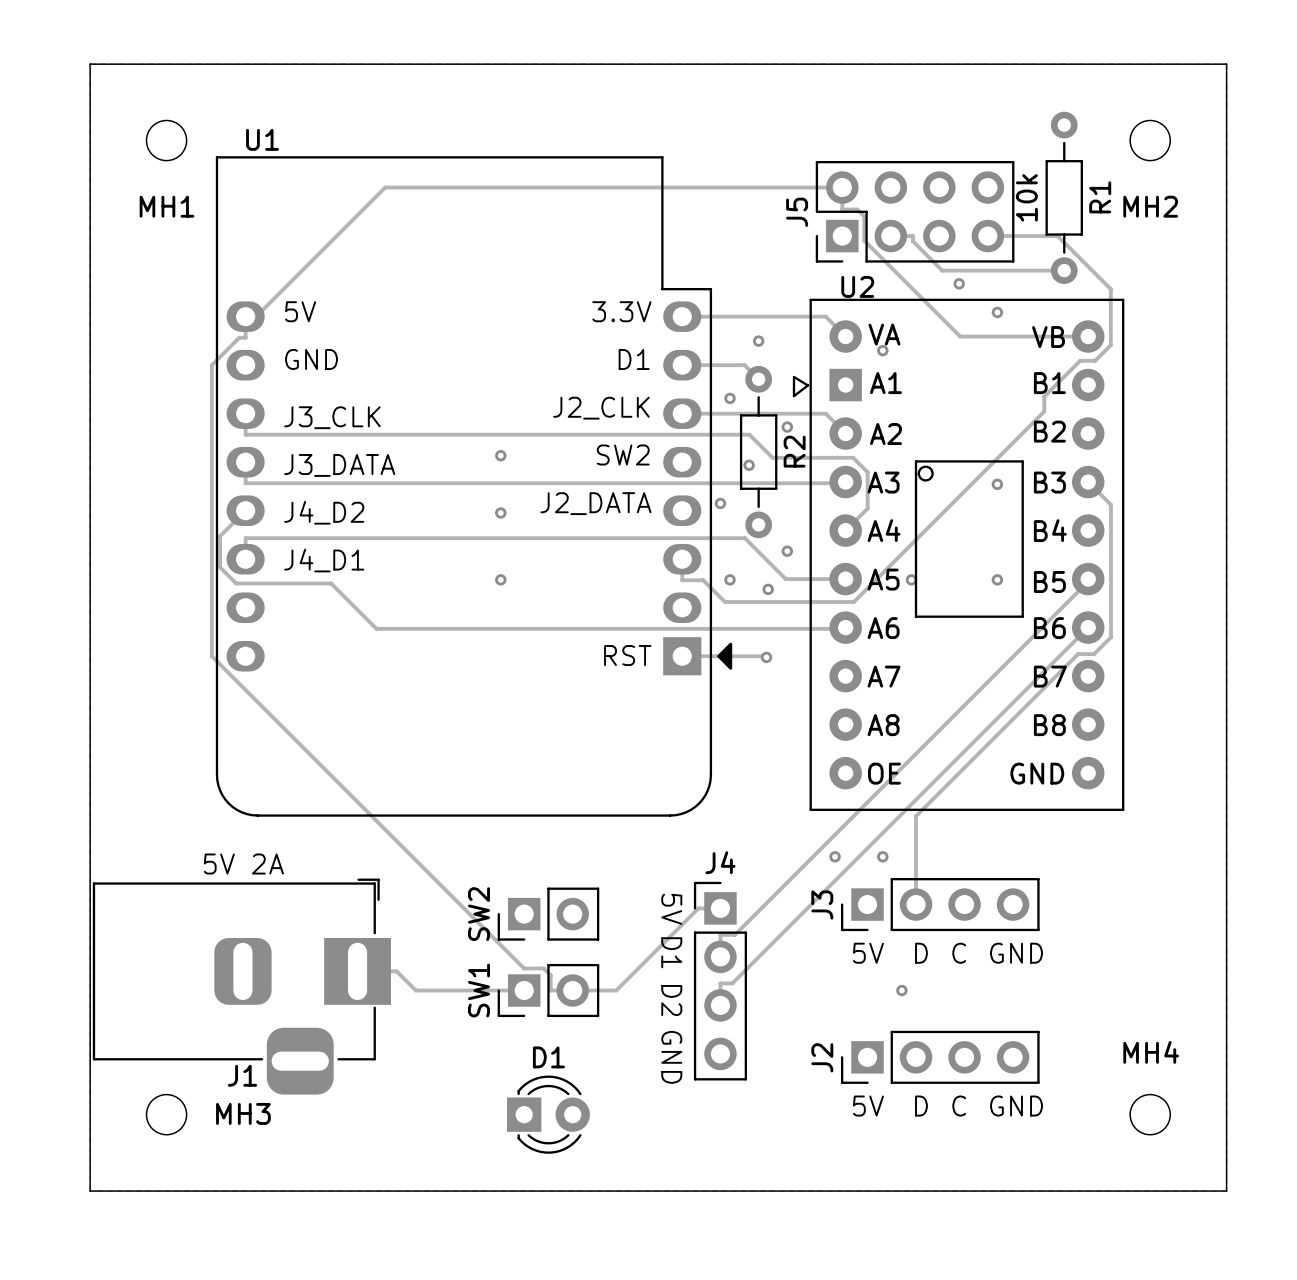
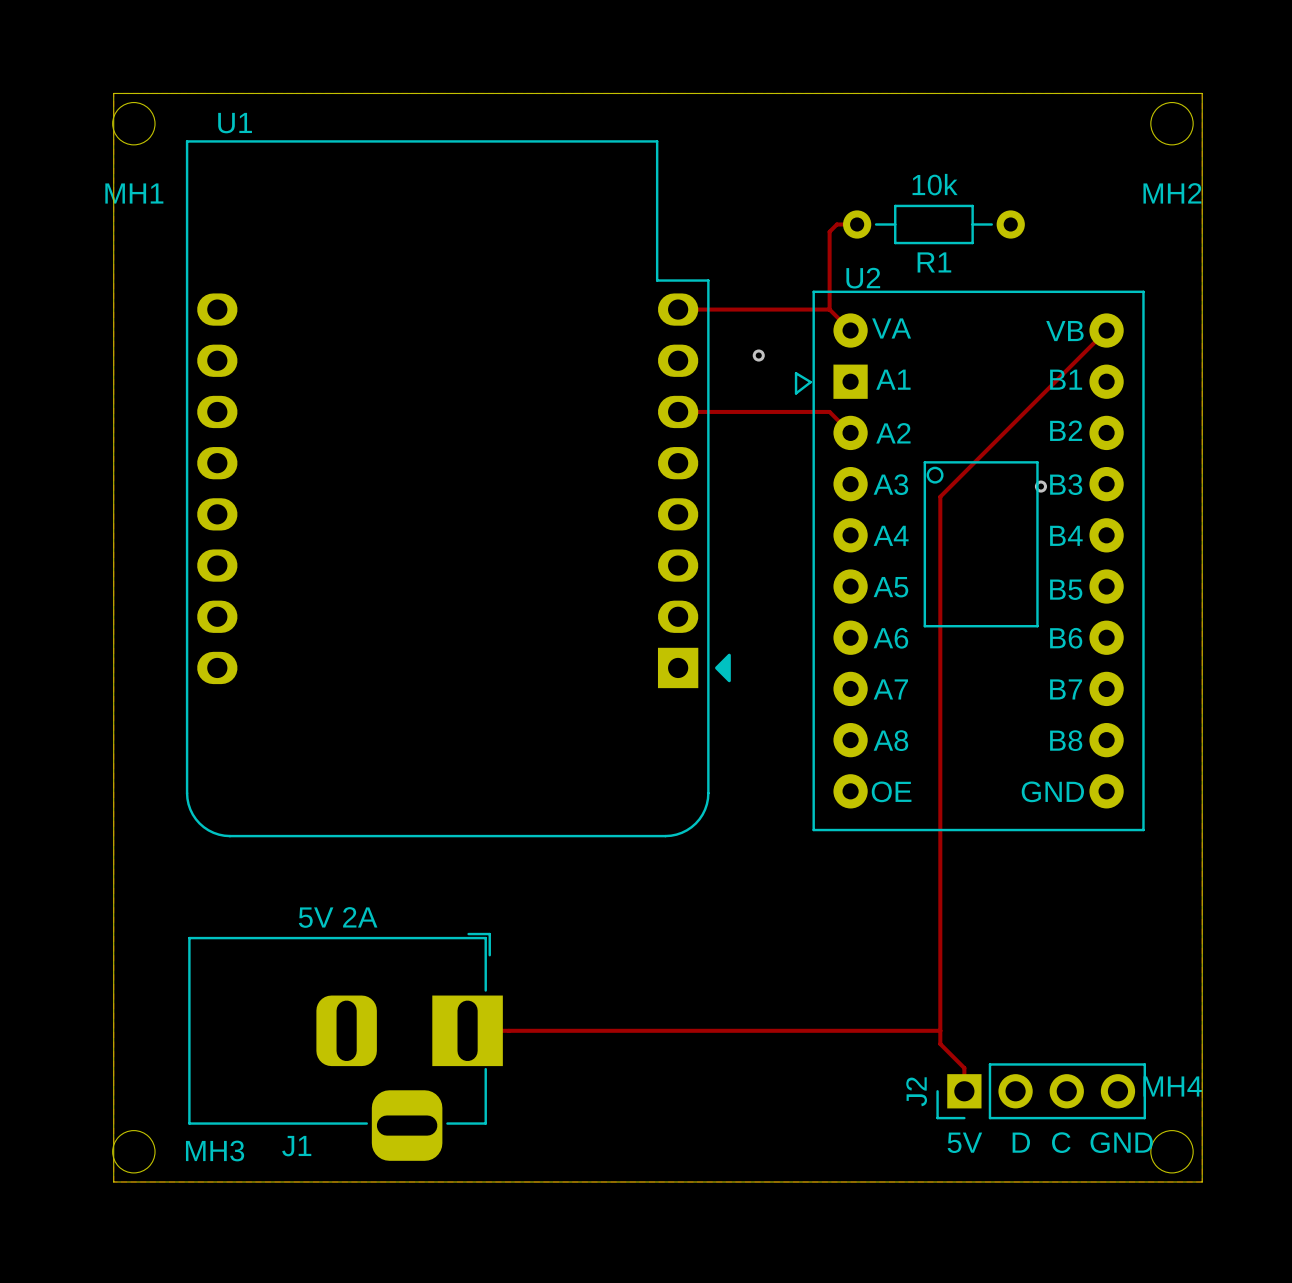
board edge: (90, 64) (1226, 64) (1226, 1191) (90, 1191) (90, 64) -> (113, 93) (113, 1181) (1202, 1181) (1202, 93) (113, 93)
R1 rotation: 0° (1064, 197) -> 90° clockwise (933, 224)
R1 position: (1064, 197) -> (933, 224)
J5: (915, 211) -> none
track: none -> (857, 224) (836, 224) (829, 231) (829, 309)
track: (890, 236) (912, 236) (912, 241) (942, 270) (1064, 270) -> none
track: (987, 236) (1057, 236) (1110, 289) (1110, 345) (1095, 360) (1080, 360) (1044, 396) (1044, 411) (853, 601) (725, 601) (703, 580) (682, 580) (682, 559) -> none
via: (959, 283) -> none
text: 5V (300, 311) -> none
text: 3.3V (621, 311) -> none
via: (997, 312) -> none
track: (245, 316) (245, 337) (239, 337) (211, 365) (211, 656) (524, 968) (543, 968) (550, 975) (550, 990) (616, 990) (698, 908) (720, 908) -> none
track: (245, 327) (385, 187) (842, 187) (842, 209) (857, 209) (864, 216) (864, 240) (960, 336) (1088, 336) -> (964, 1091) (964, 1068) (940, 1044) (940, 496) (1106, 330)
via position: (758, 341) -> (758, 355)
via: (882, 350) -> none
text: GND (311, 359) -> none
text: D1 (634, 359) -> none
track: (682, 365) (744, 365) (758, 379) -> none
via: (730, 398) -> none
text: J2_CLK (601, 408) -> none
track: (245, 413) (245, 434) (749, 434) (772, 457) (853, 457) (867, 472) (867, 508) (845, 530) -> none
text: J3_CLK (332, 417) -> none
via: (787, 427) -> none
R2: (758, 452) -> none
text: SW2 (623, 454) -> none
via: (500, 455) -> none
track: (245, 462) (245, 483) (845, 482) -> none
text: J3_DATA (339, 465) -> none
via: (749, 465) -> none
track: (1088, 482) (1111, 504) (1111, 637) (1094, 654) (1078, 654) (916, 816) (916, 904) -> none
via position: (997, 484) -> (1040, 486)
text: J2_DATA (595, 503) -> none
via: (720, 503) -> none
track: (245, 510) (220, 536) (220, 567) (236, 583) (331, 583) (376, 628) (845, 627) -> none
text: J4_D2 (324, 512) -> none
via: (500, 513) -> none
via: (787, 551) -> none
track: (245, 559) (245, 538) (744, 538) (785, 579) (845, 579) -> none
text: J4_D1 (324, 560) -> none
via: (500, 579) -> none
via: (730, 579) -> none
via: (911, 579) -> none
via: (997, 579) -> none
track: (1088, 579) (1088, 581) (734, 934) (720, 934) (720, 956) -> none
via: (768, 589) -> none
track: (1088, 627) (732, 983) (720, 983) (720, 1005) -> none
text: RST (627, 655) -> none
track: (682, 656) (766, 657) -> none
via: (766, 657) -> none
via: (835, 856) -> none
via: (882, 856) -> none
text position: 5V 2A (243, 864) -> 5V 2A (338, 917)
J3: (940, 904) -> none
text: 5V (671, 909) -> none
SW2: (548, 914) -> none
text: D1 (671, 952) -> none
text: 5V (868, 953) -> none
text: D (921, 953) -> none
text: C (959, 953) -> none
text: GND (1016, 953) -> none
track: (357, 971) (396, 971) (415, 990) (524, 990) -> none
J4: (720, 981) -> none
J1 position: (241, 986) -> (345, 1046)
SW1: (548, 990) -> none
via: (901, 990) -> none
track: none -> (467, 1030) (940, 1030)
text: D2 (671, 1000) -> none
text: GND (671, 1057) -> none
J2 position: (940, 1057) -> (1041, 1091)
J1 name position: J1 (242, 1075) -> J1 (296, 1146)
text position: 5V (868, 1106) -> 5V (964, 1142)
text position: D (921, 1106) -> D (1021, 1142)
text position: C (959, 1106) -> C (1061, 1142)
text position: GND (1016, 1106) -> GND (1121, 1142)
D1: (548, 1114) -> none

